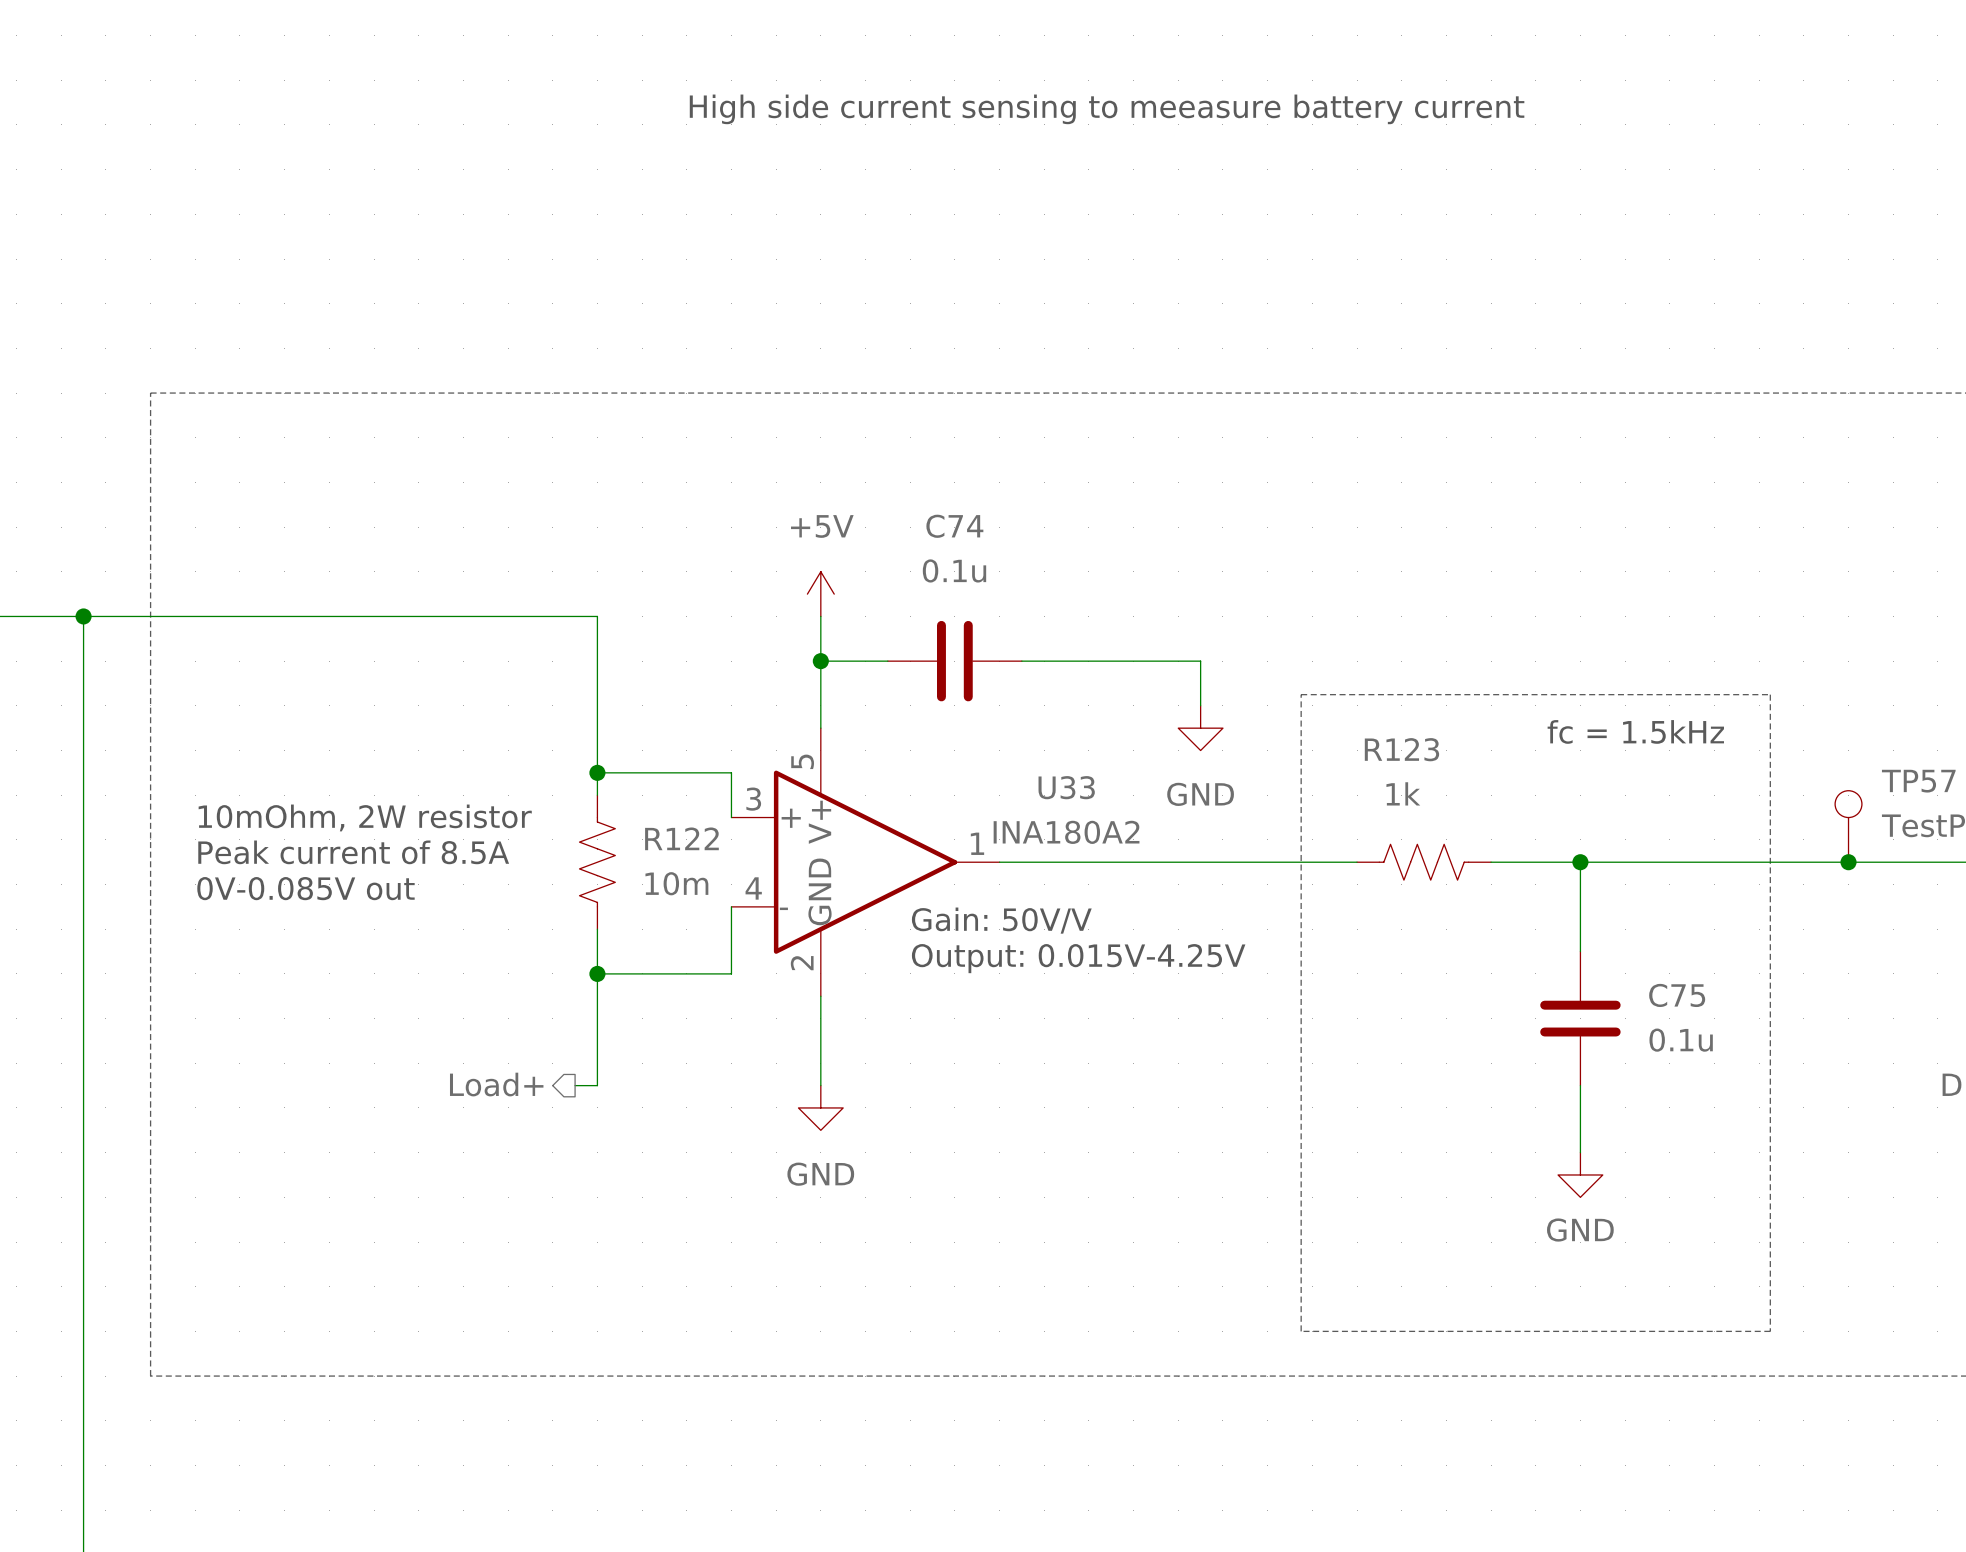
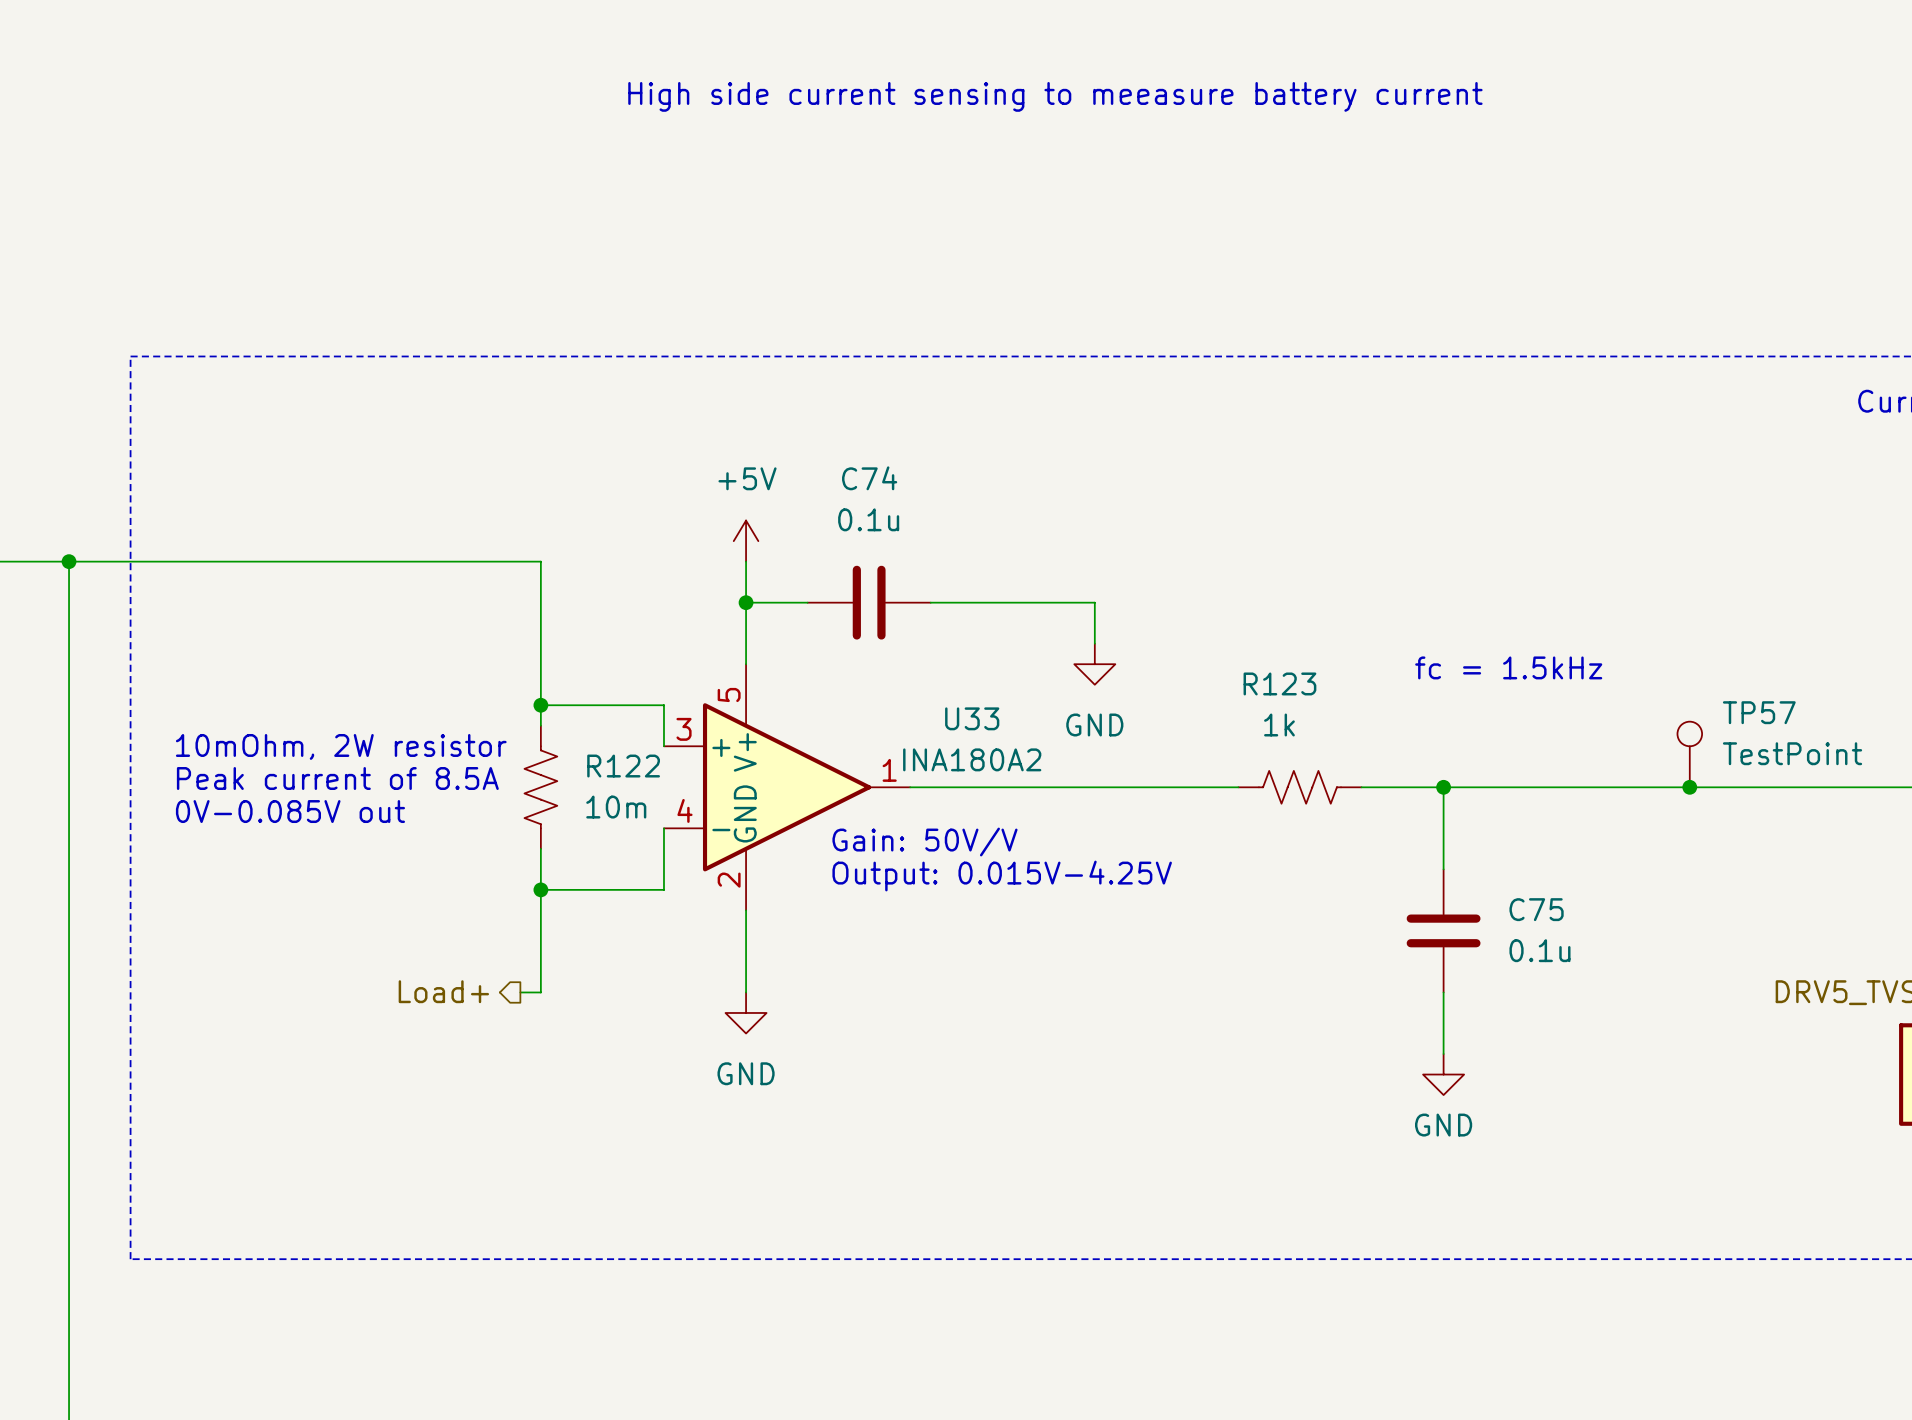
line: (1301, 694) (1770, 694) (1770, 1331) (1301, 1331) (1301, 694) -> none

